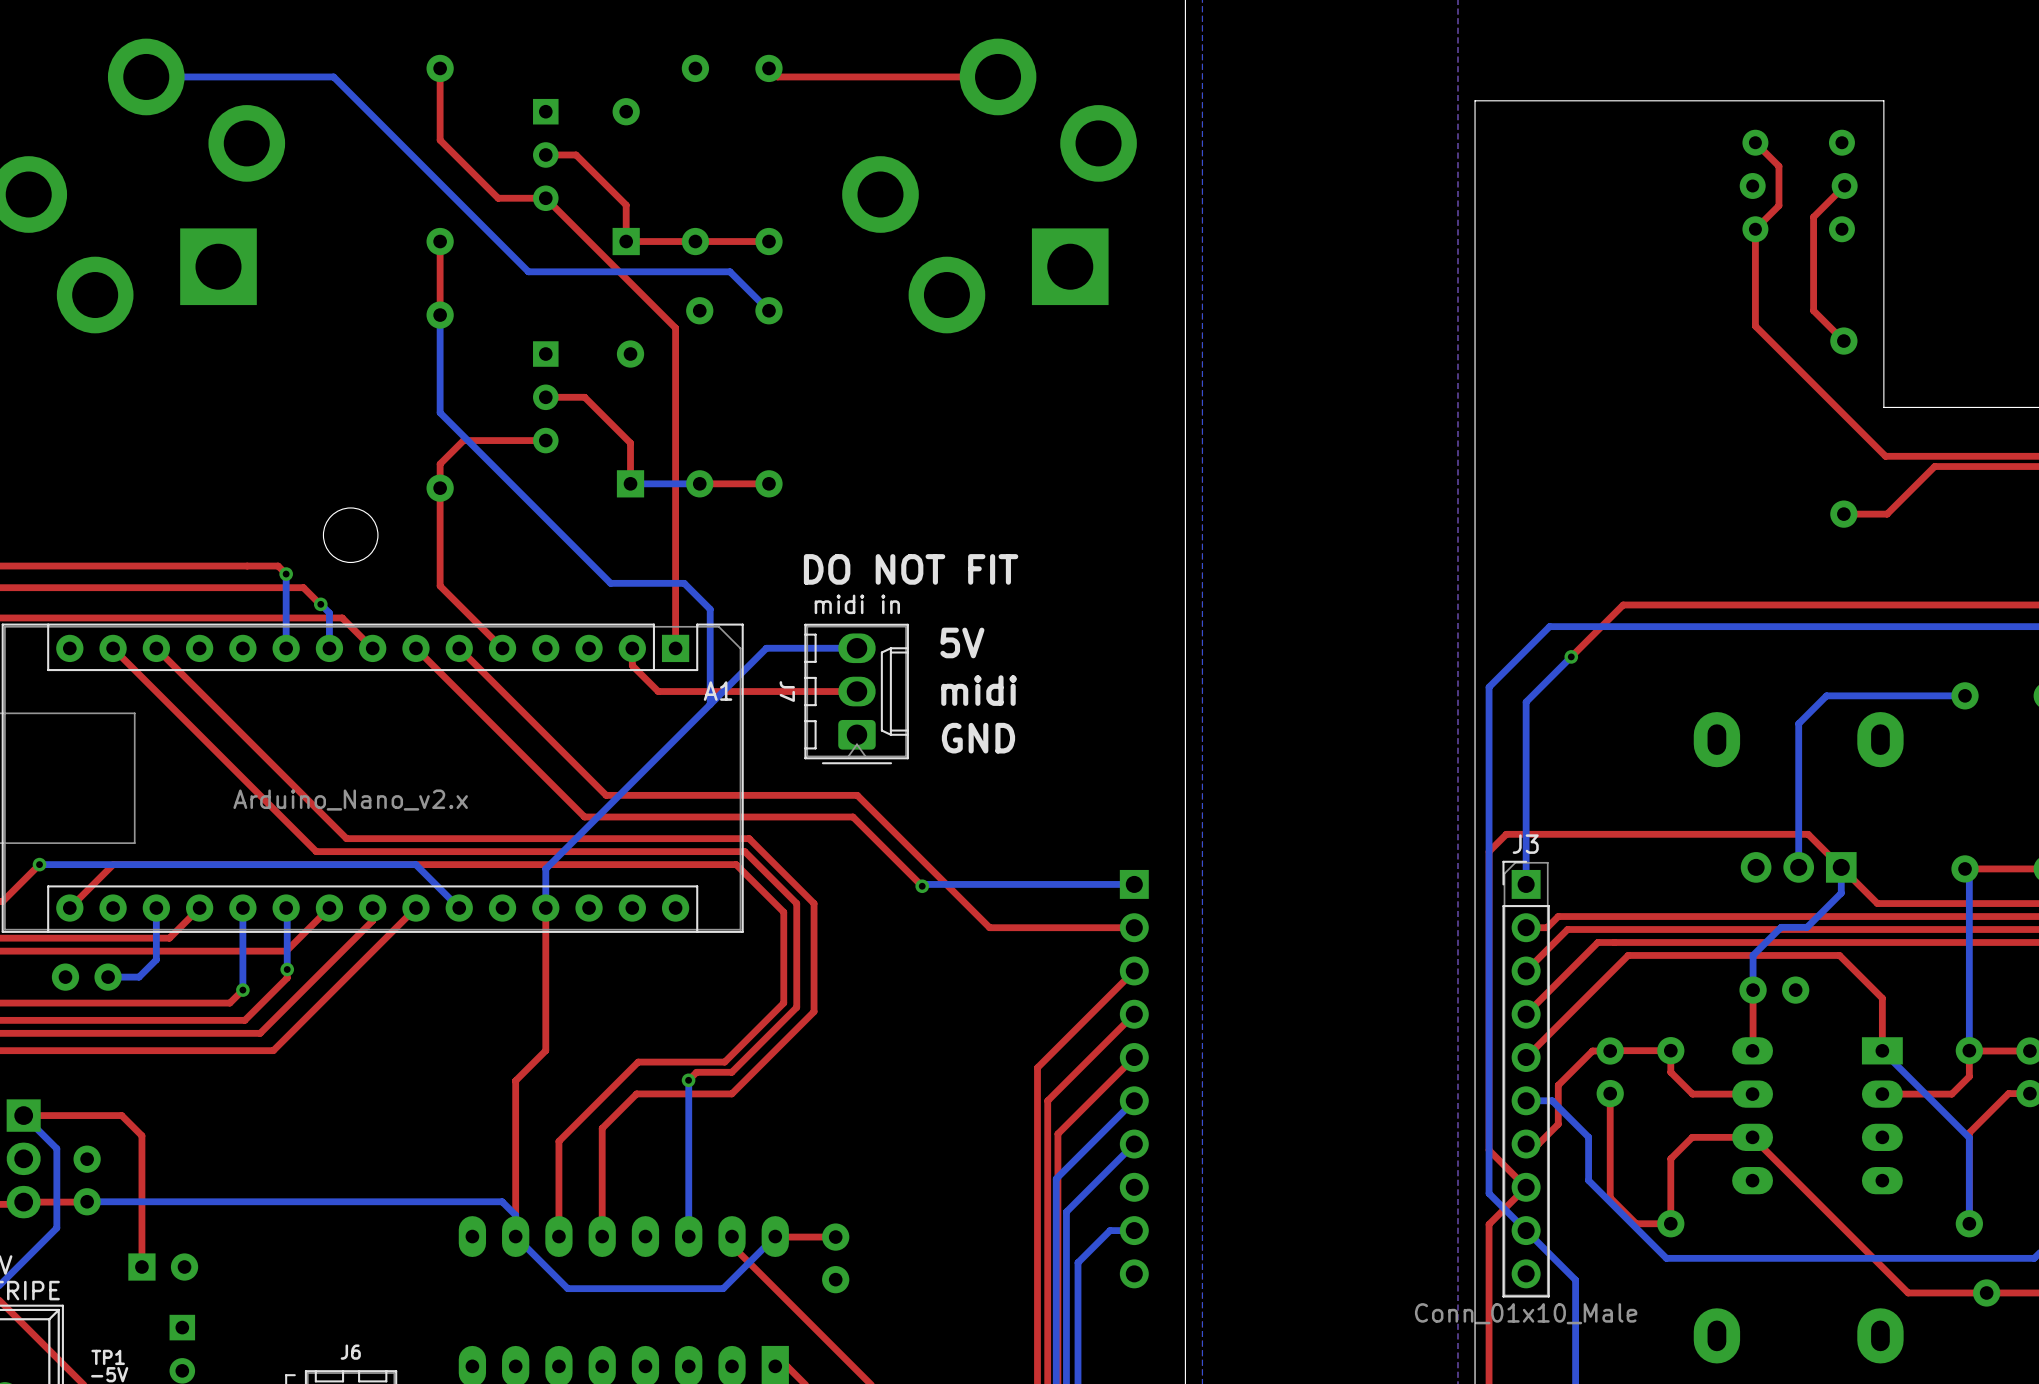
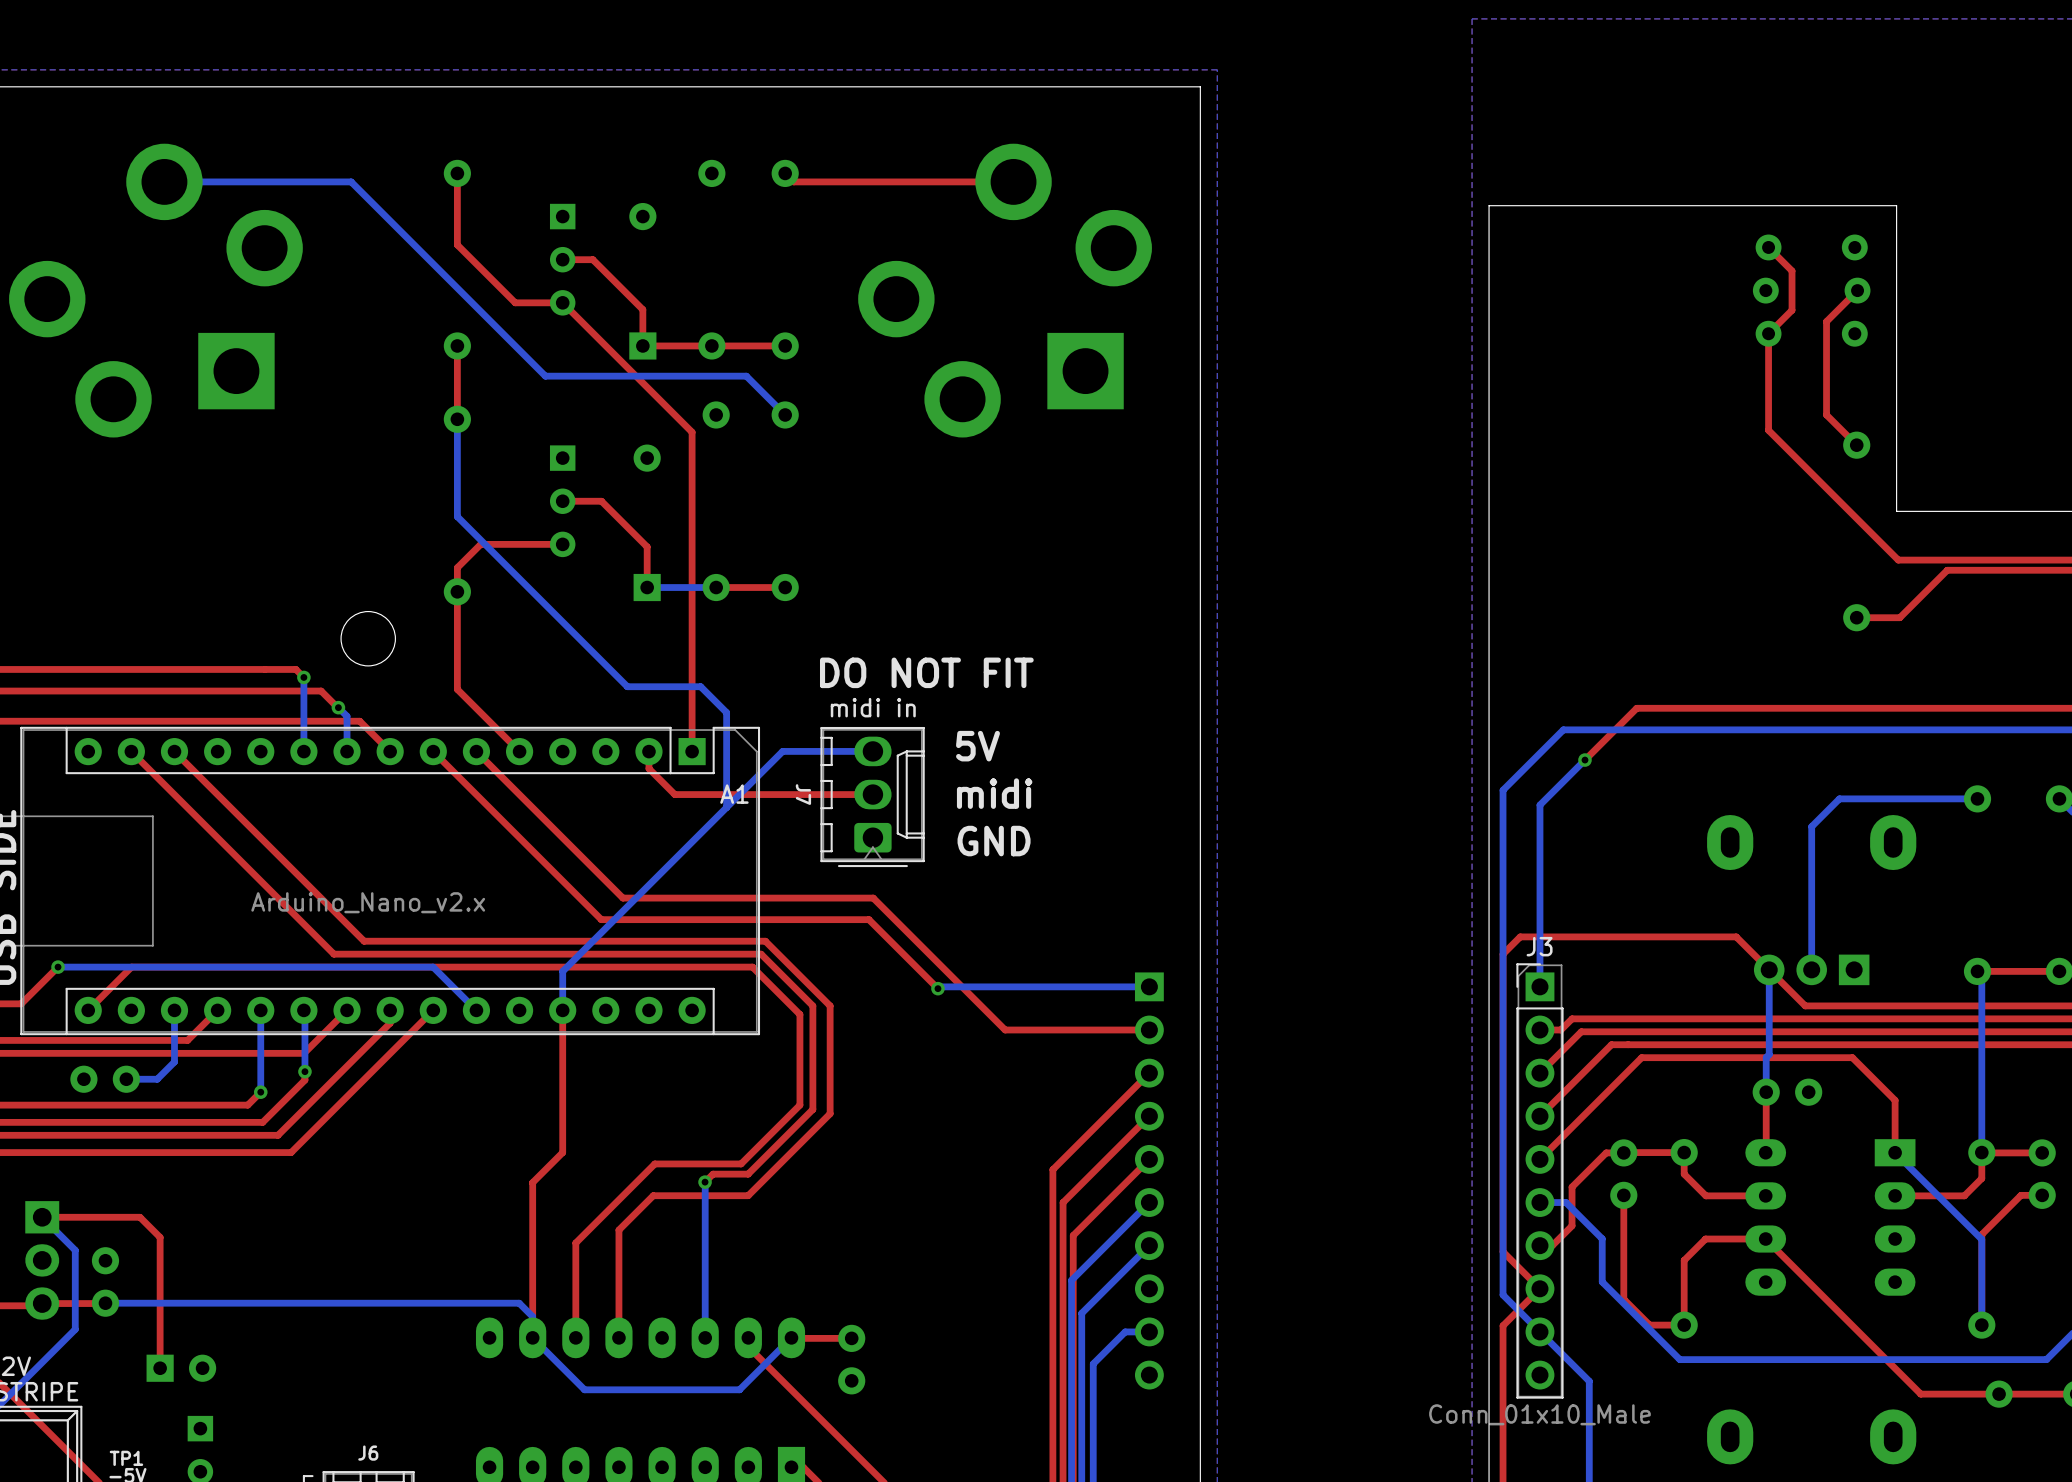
top track: (1723, 834) (1808, 834) (1877, 903) -> (1736, 936) (1805, 1005) (1890, 1005)
bottom track: (1841, 867) (1841, 893) (1807, 927) (1781, 927) (1756, 952) -> (1769, 969) (1769, 1054)

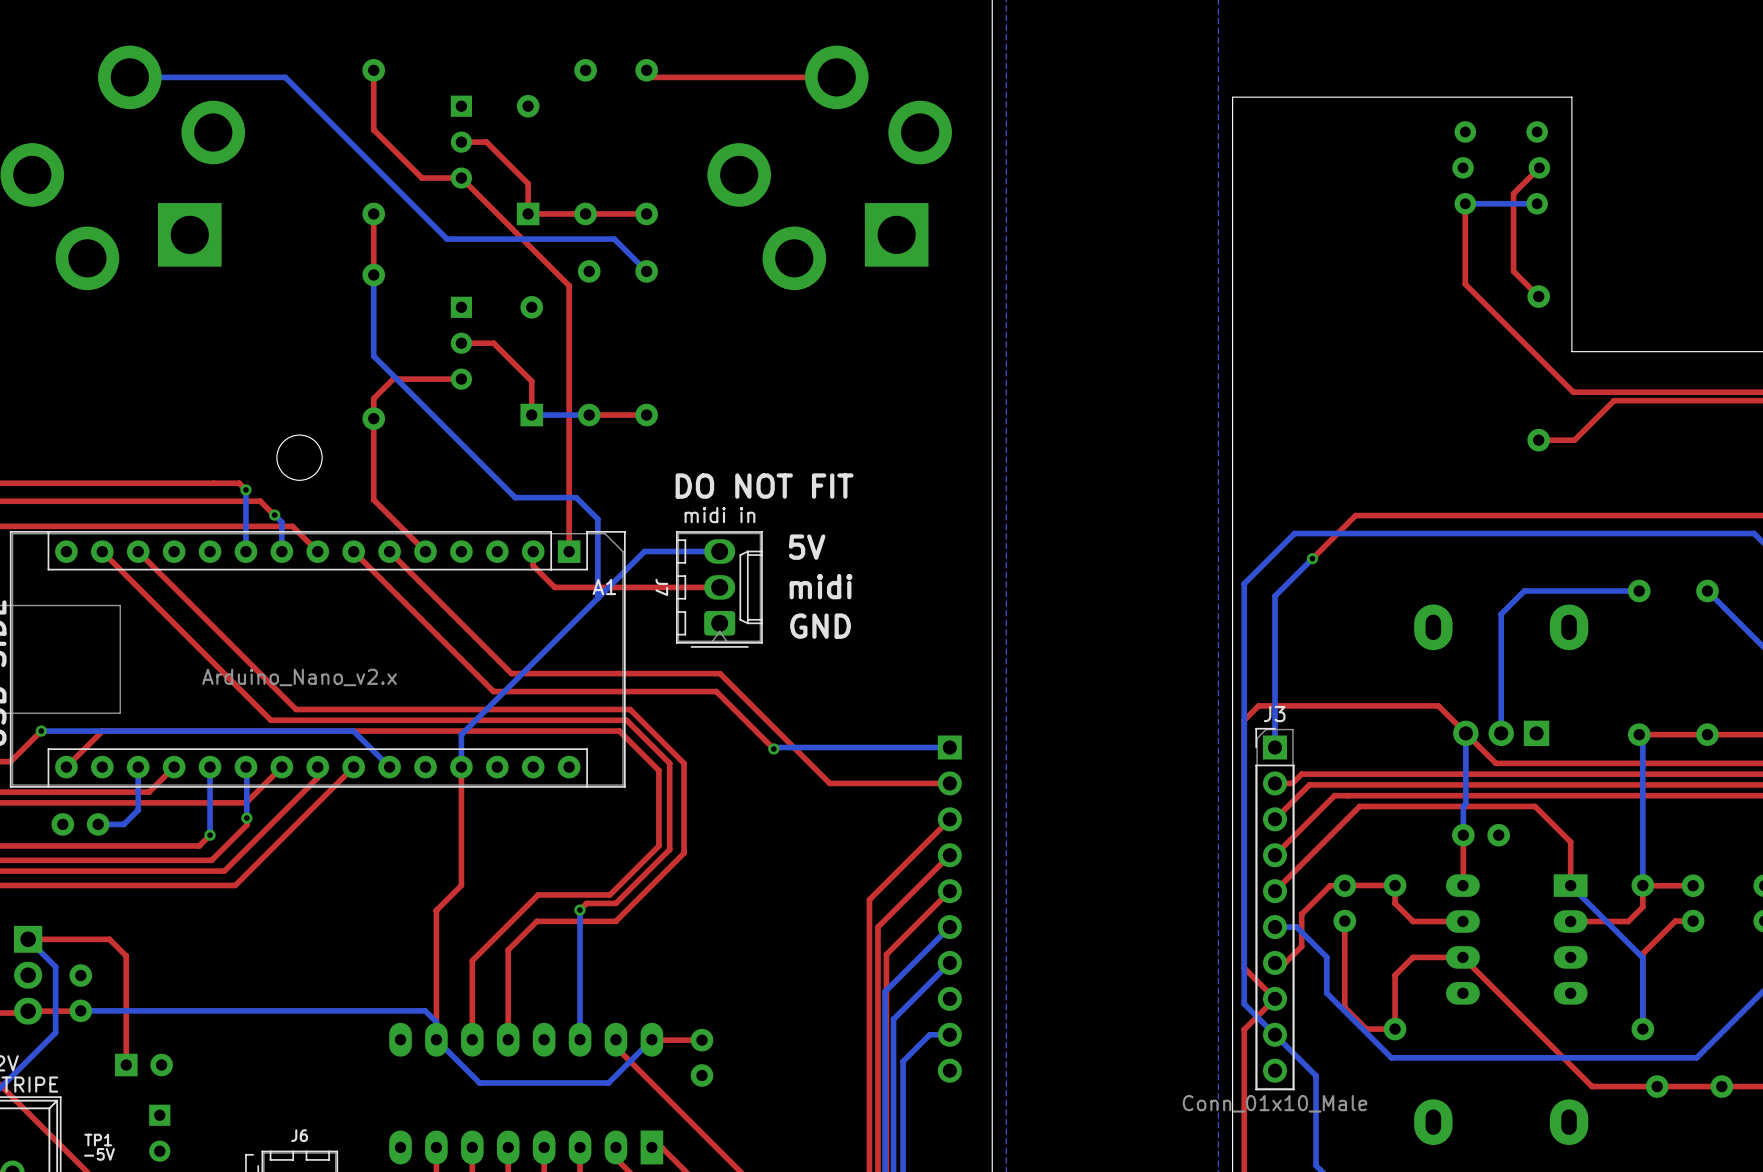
top track: (1768, 247) (1792, 270) (1792, 310) (1768, 333) -> none
bottom track: none -> (1537, 203) (1465, 203)

